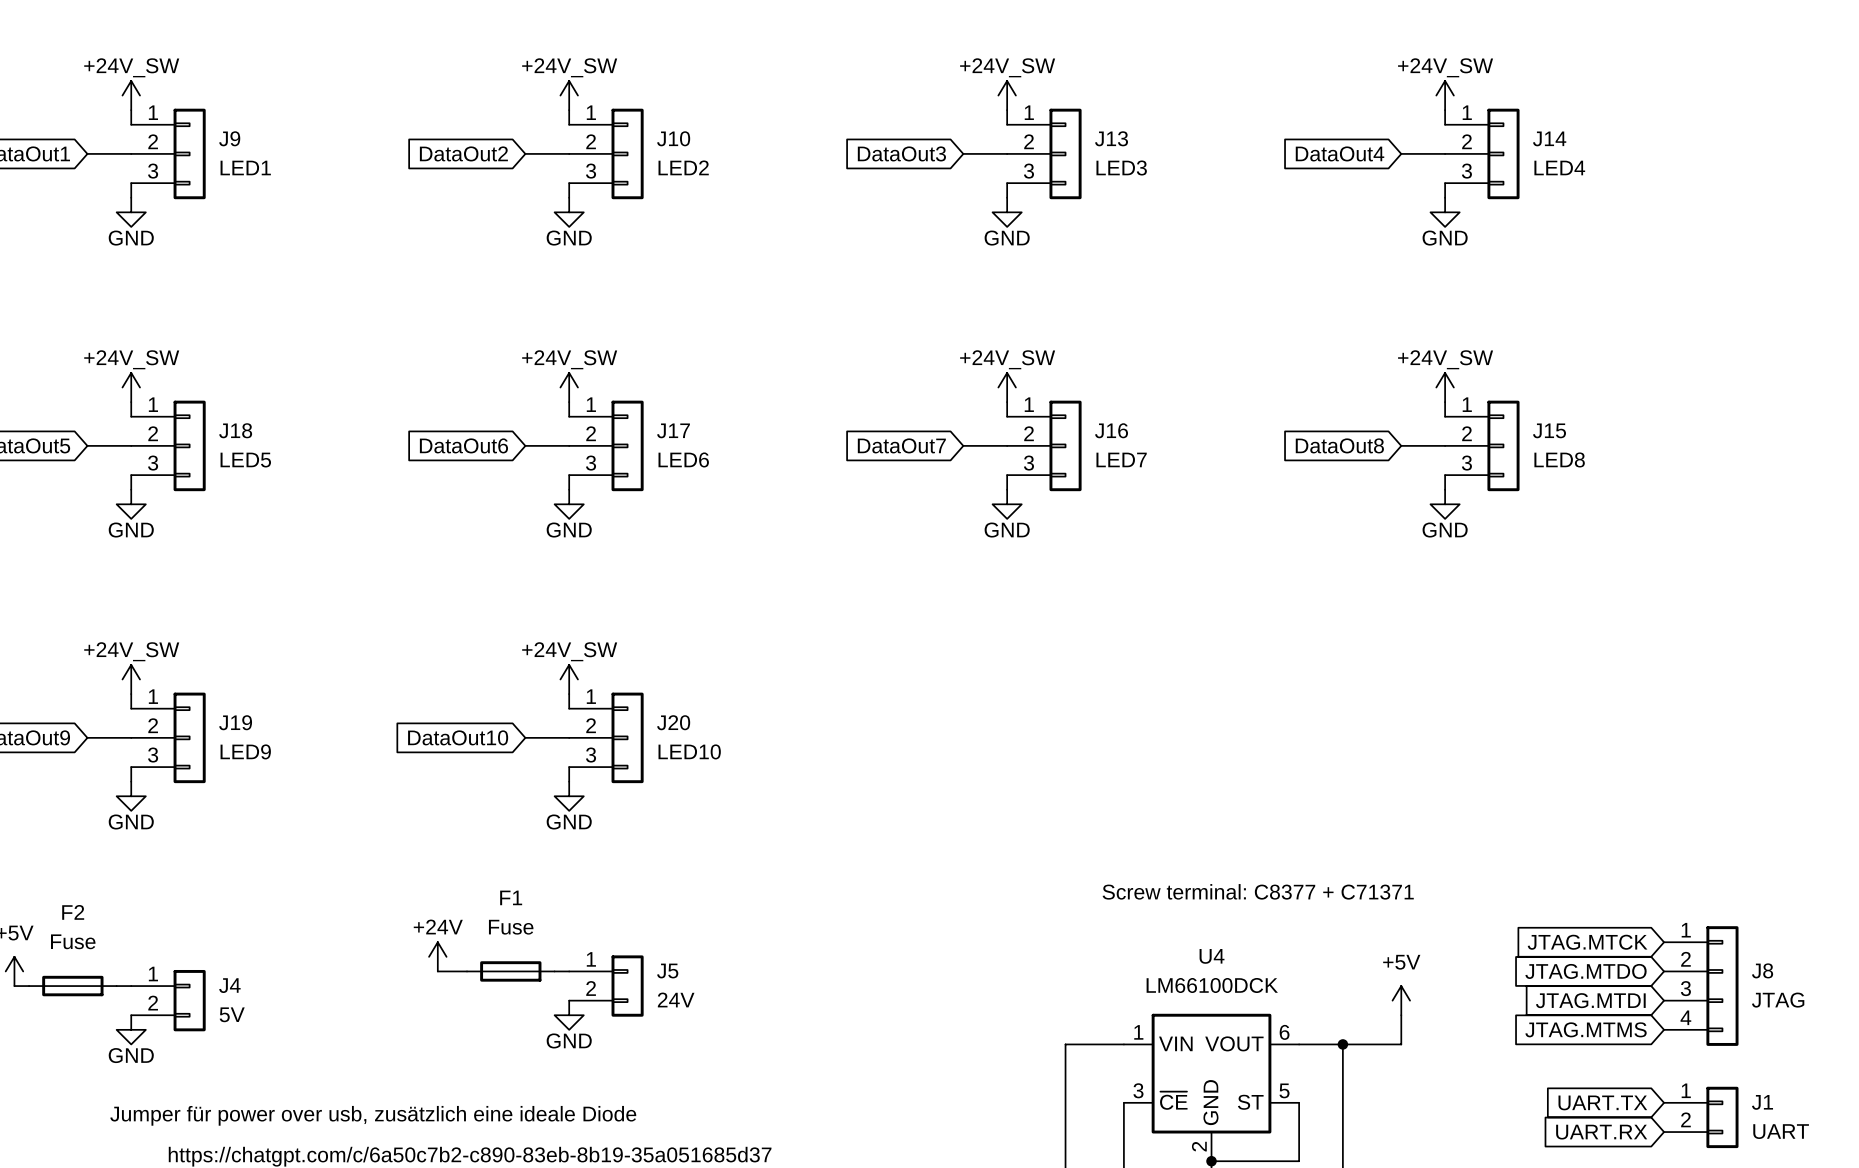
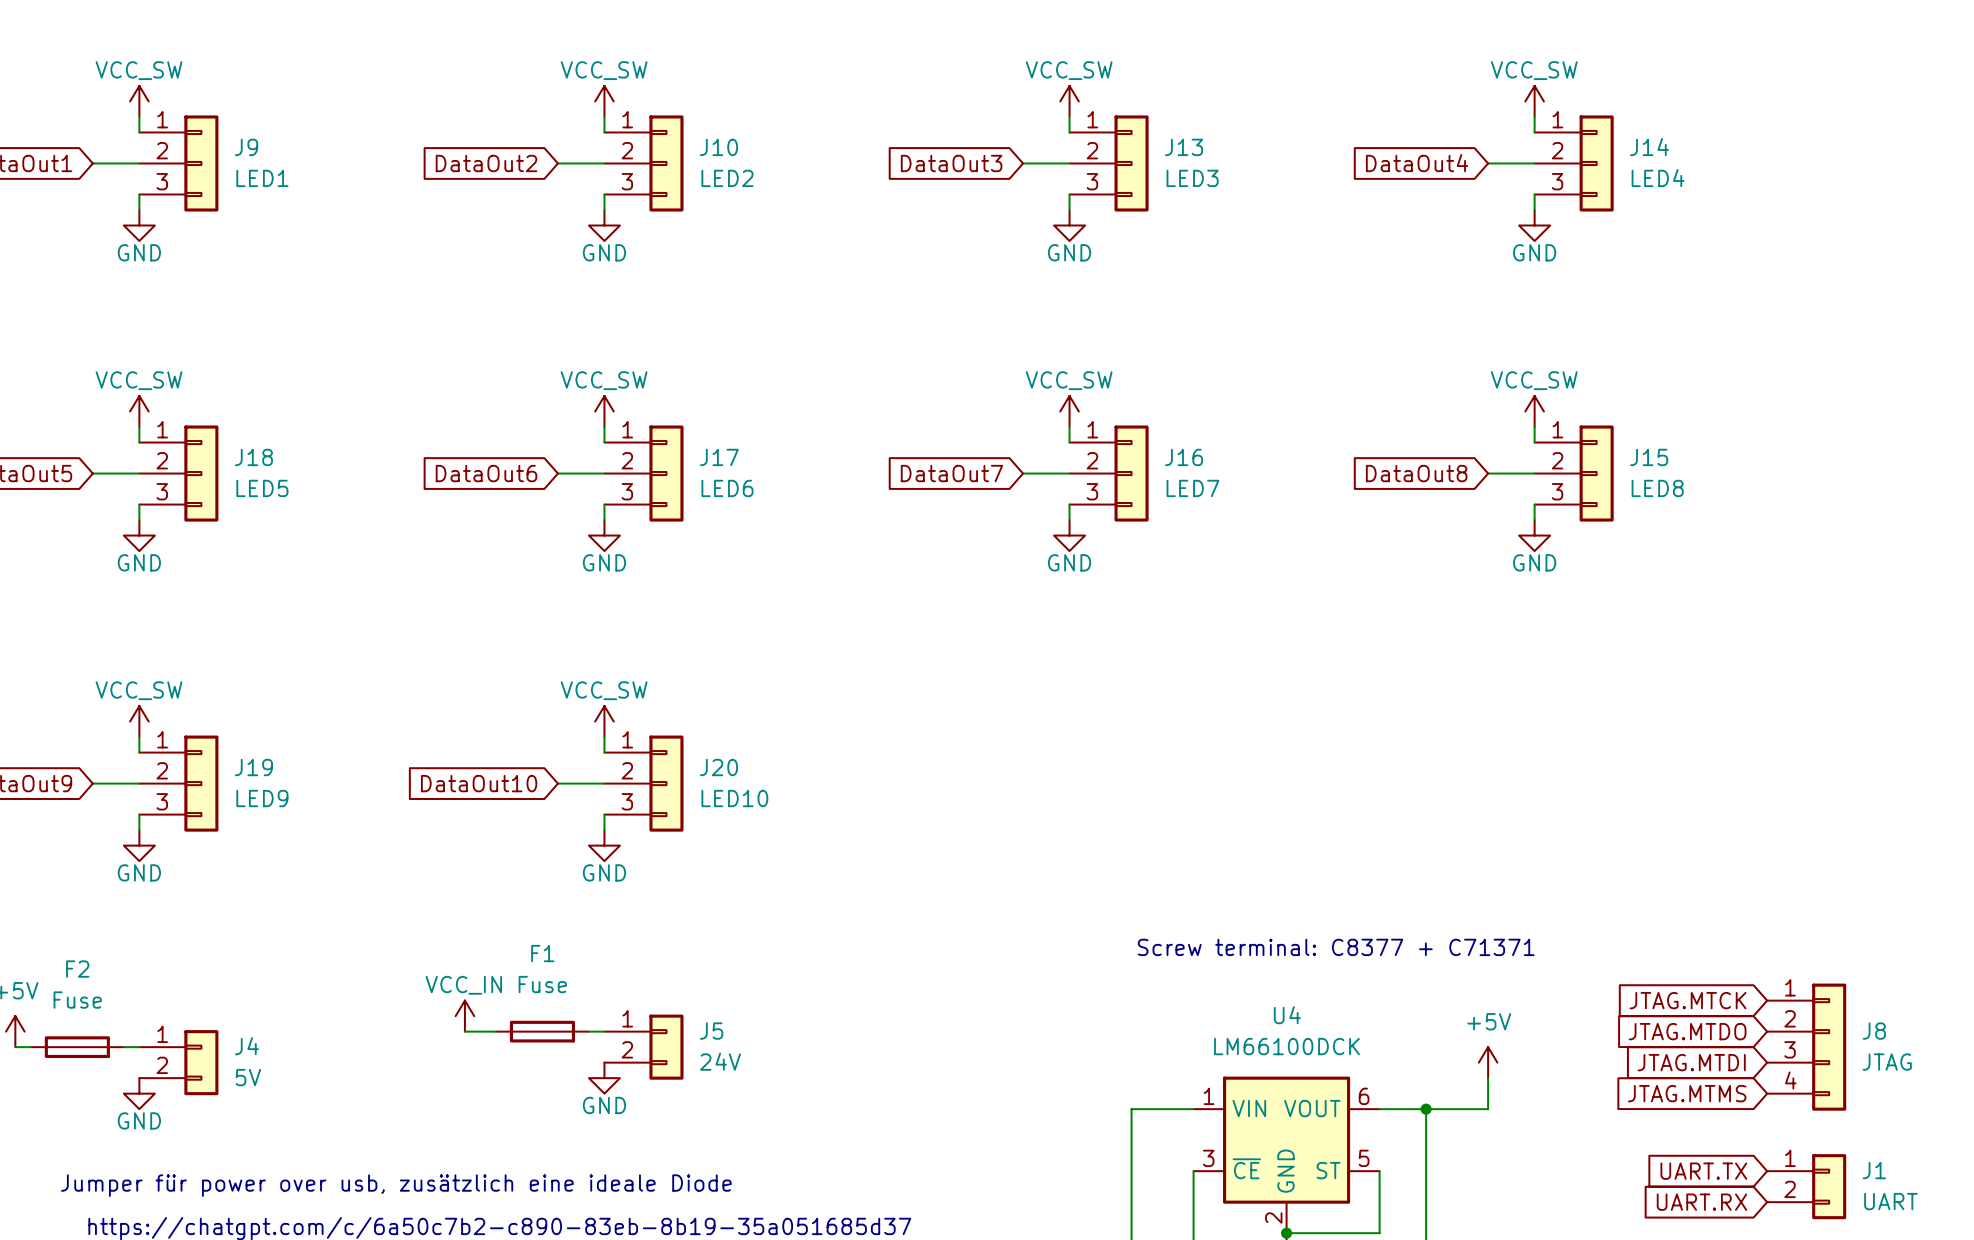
power symbol: +24V_SW (131, 95) -> VCC_SW (139, 101)
power symbol: +24V_SW (569, 95) -> VCC_SW (604, 101)
power symbol: +24V_SW (1007, 95) -> VCC_SW (1069, 101)
power symbol: +24V_SW (1445, 95) -> VCC_SW (1534, 101)
power symbol: +24V_SW (131, 387) -> VCC_SW (139, 411)
power symbol: +24V_SW (569, 387) -> VCC_SW (604, 411)
power symbol: +24V_SW (1007, 387) -> VCC_SW (1069, 411)
power symbol: +24V_SW (1445, 387) -> VCC_SW (1534, 411)
power symbol: +24V_SW (131, 679) -> VCC_SW (139, 721)
power symbol: +24V_SW (569, 679) -> VCC_SW (604, 721)
power symbol: +24V (437, 956) -> VCC_IN (464, 1016)

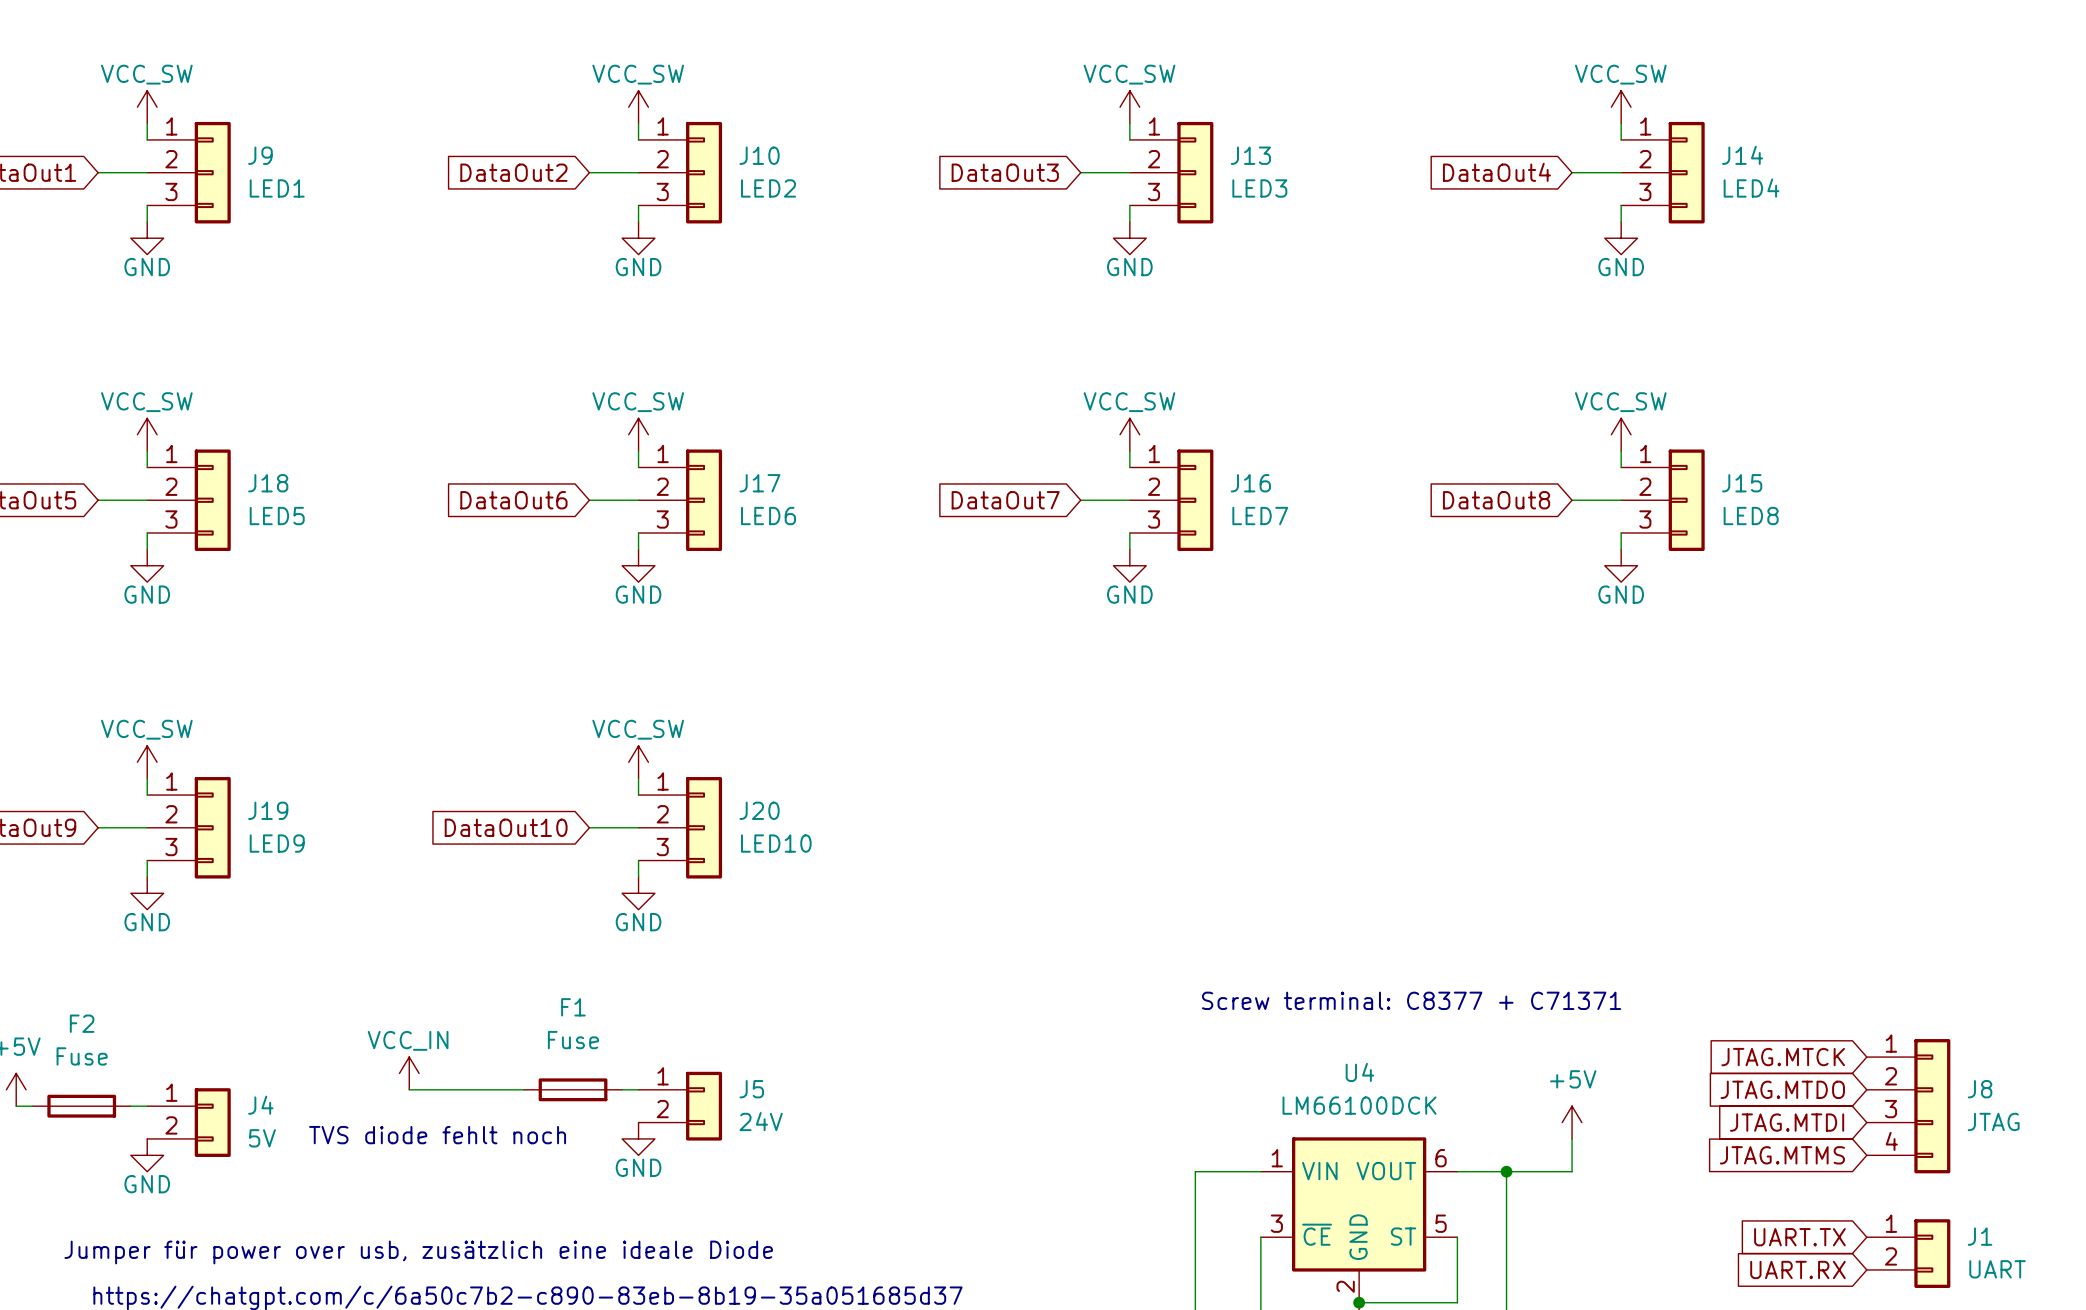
power symbol position: VCC_IN (464, 1016) -> VCC_IN (409, 1073)
wire: none -> (409, 1089) (491, 1089)
text: none -> TVS diode fehlt noch (437, 1135)

